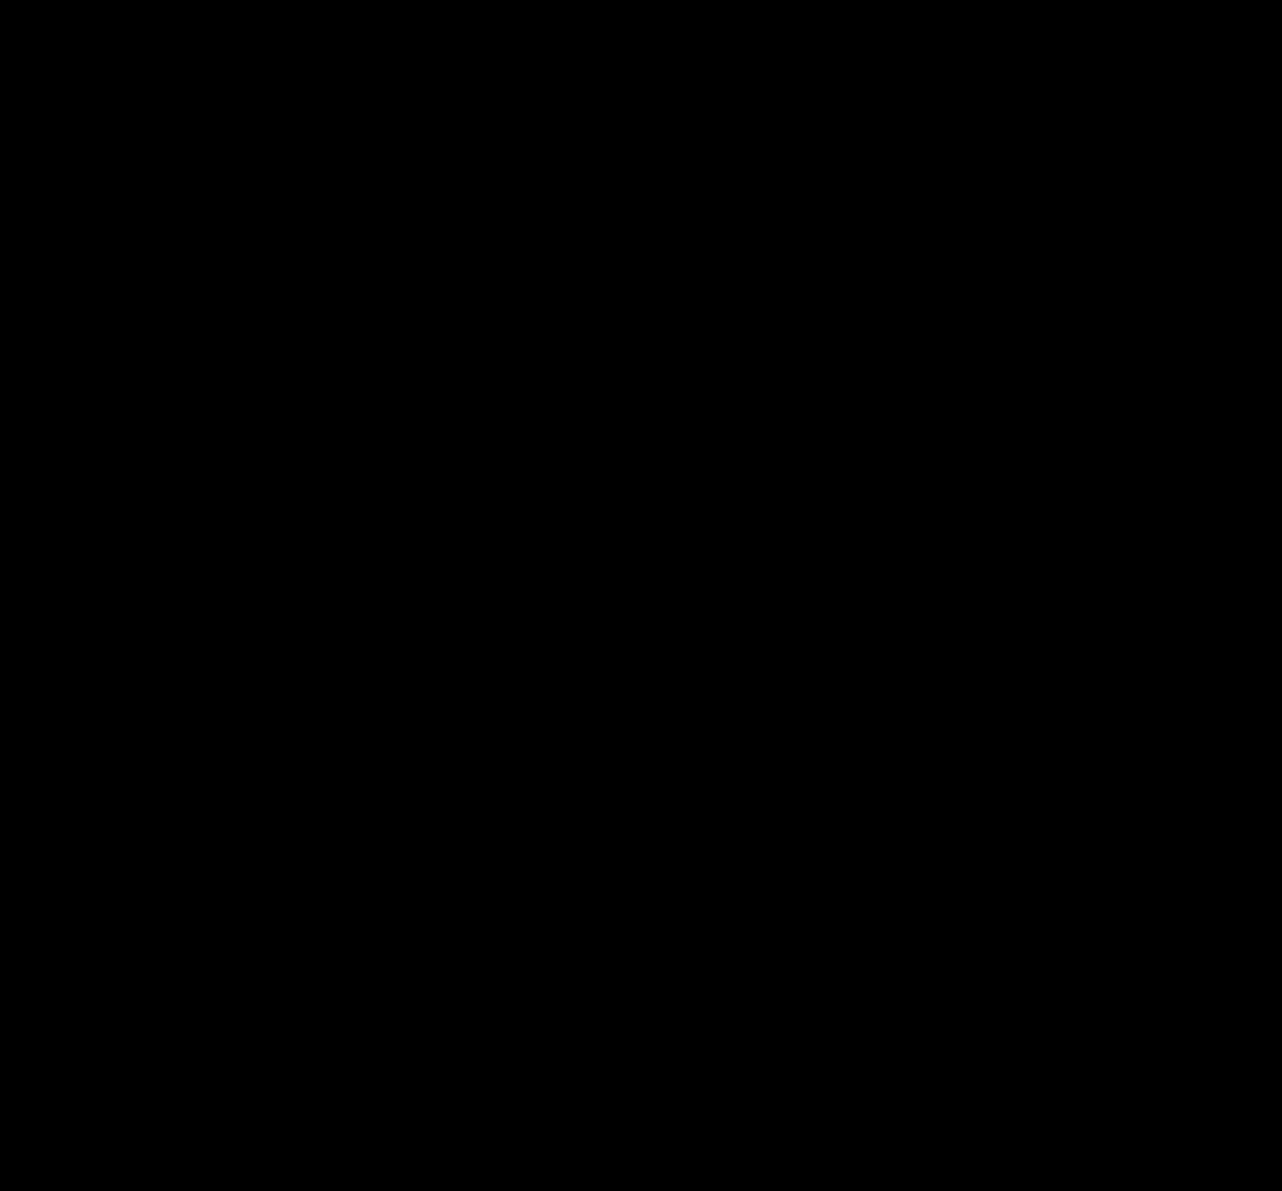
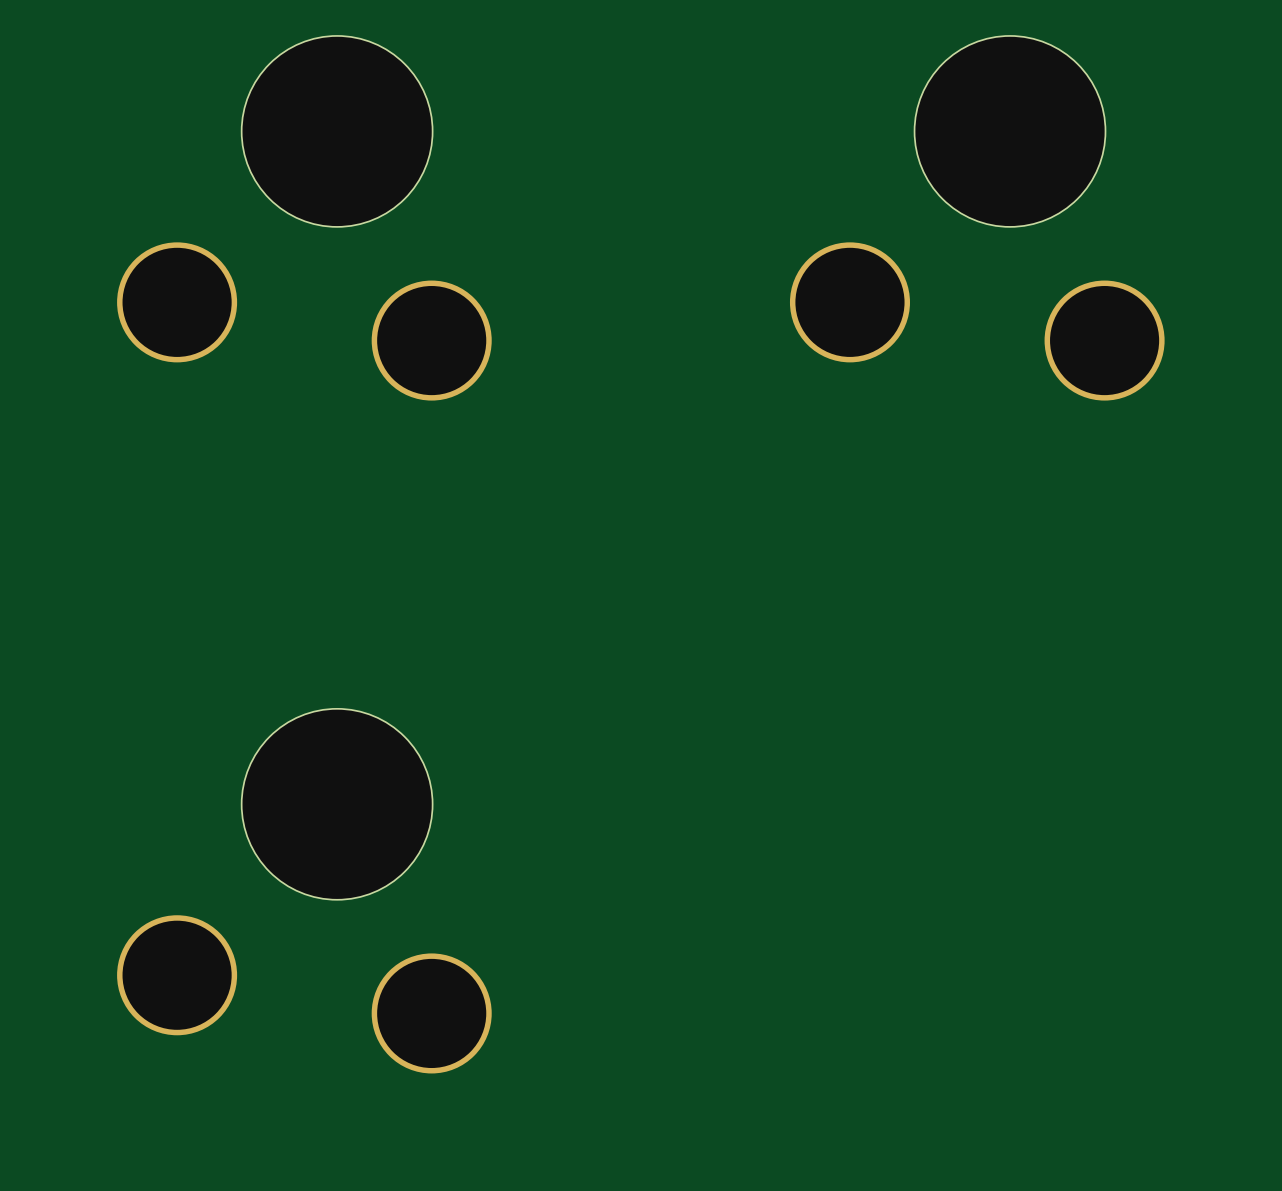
part: none -> (304, 218)
part: none -> (977, 218)
part: none -> (304, 891)

